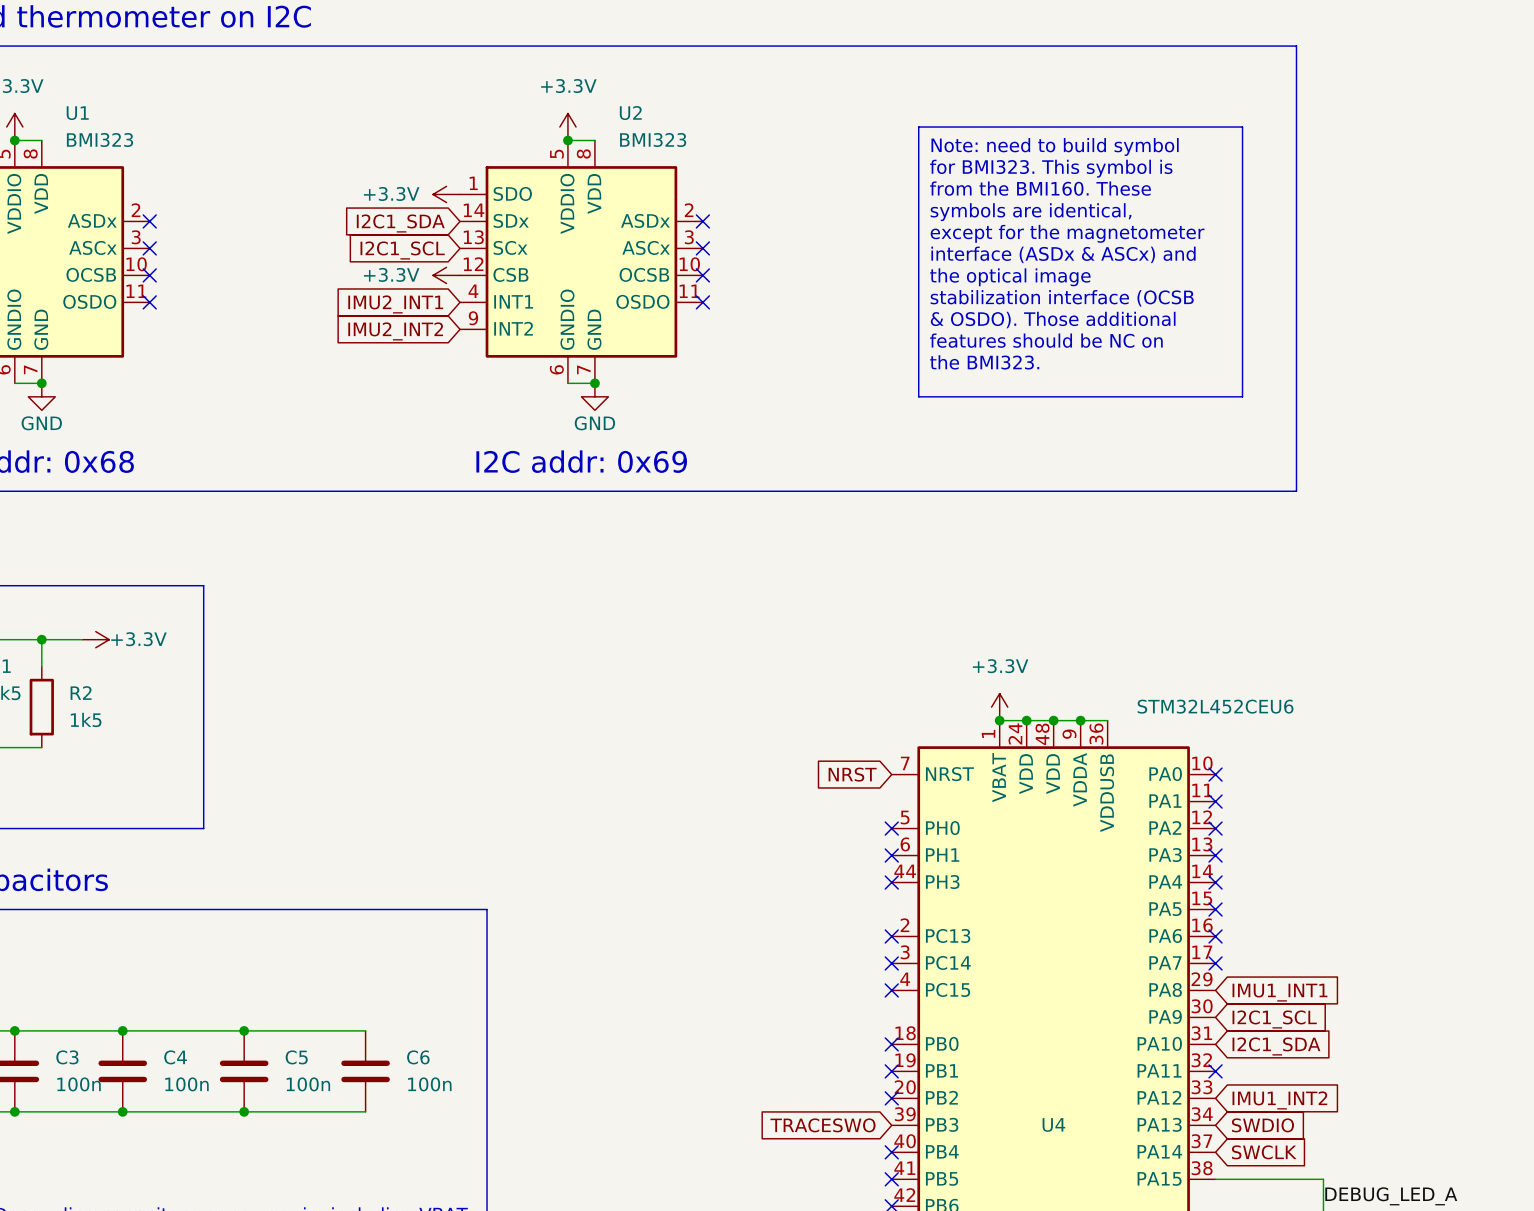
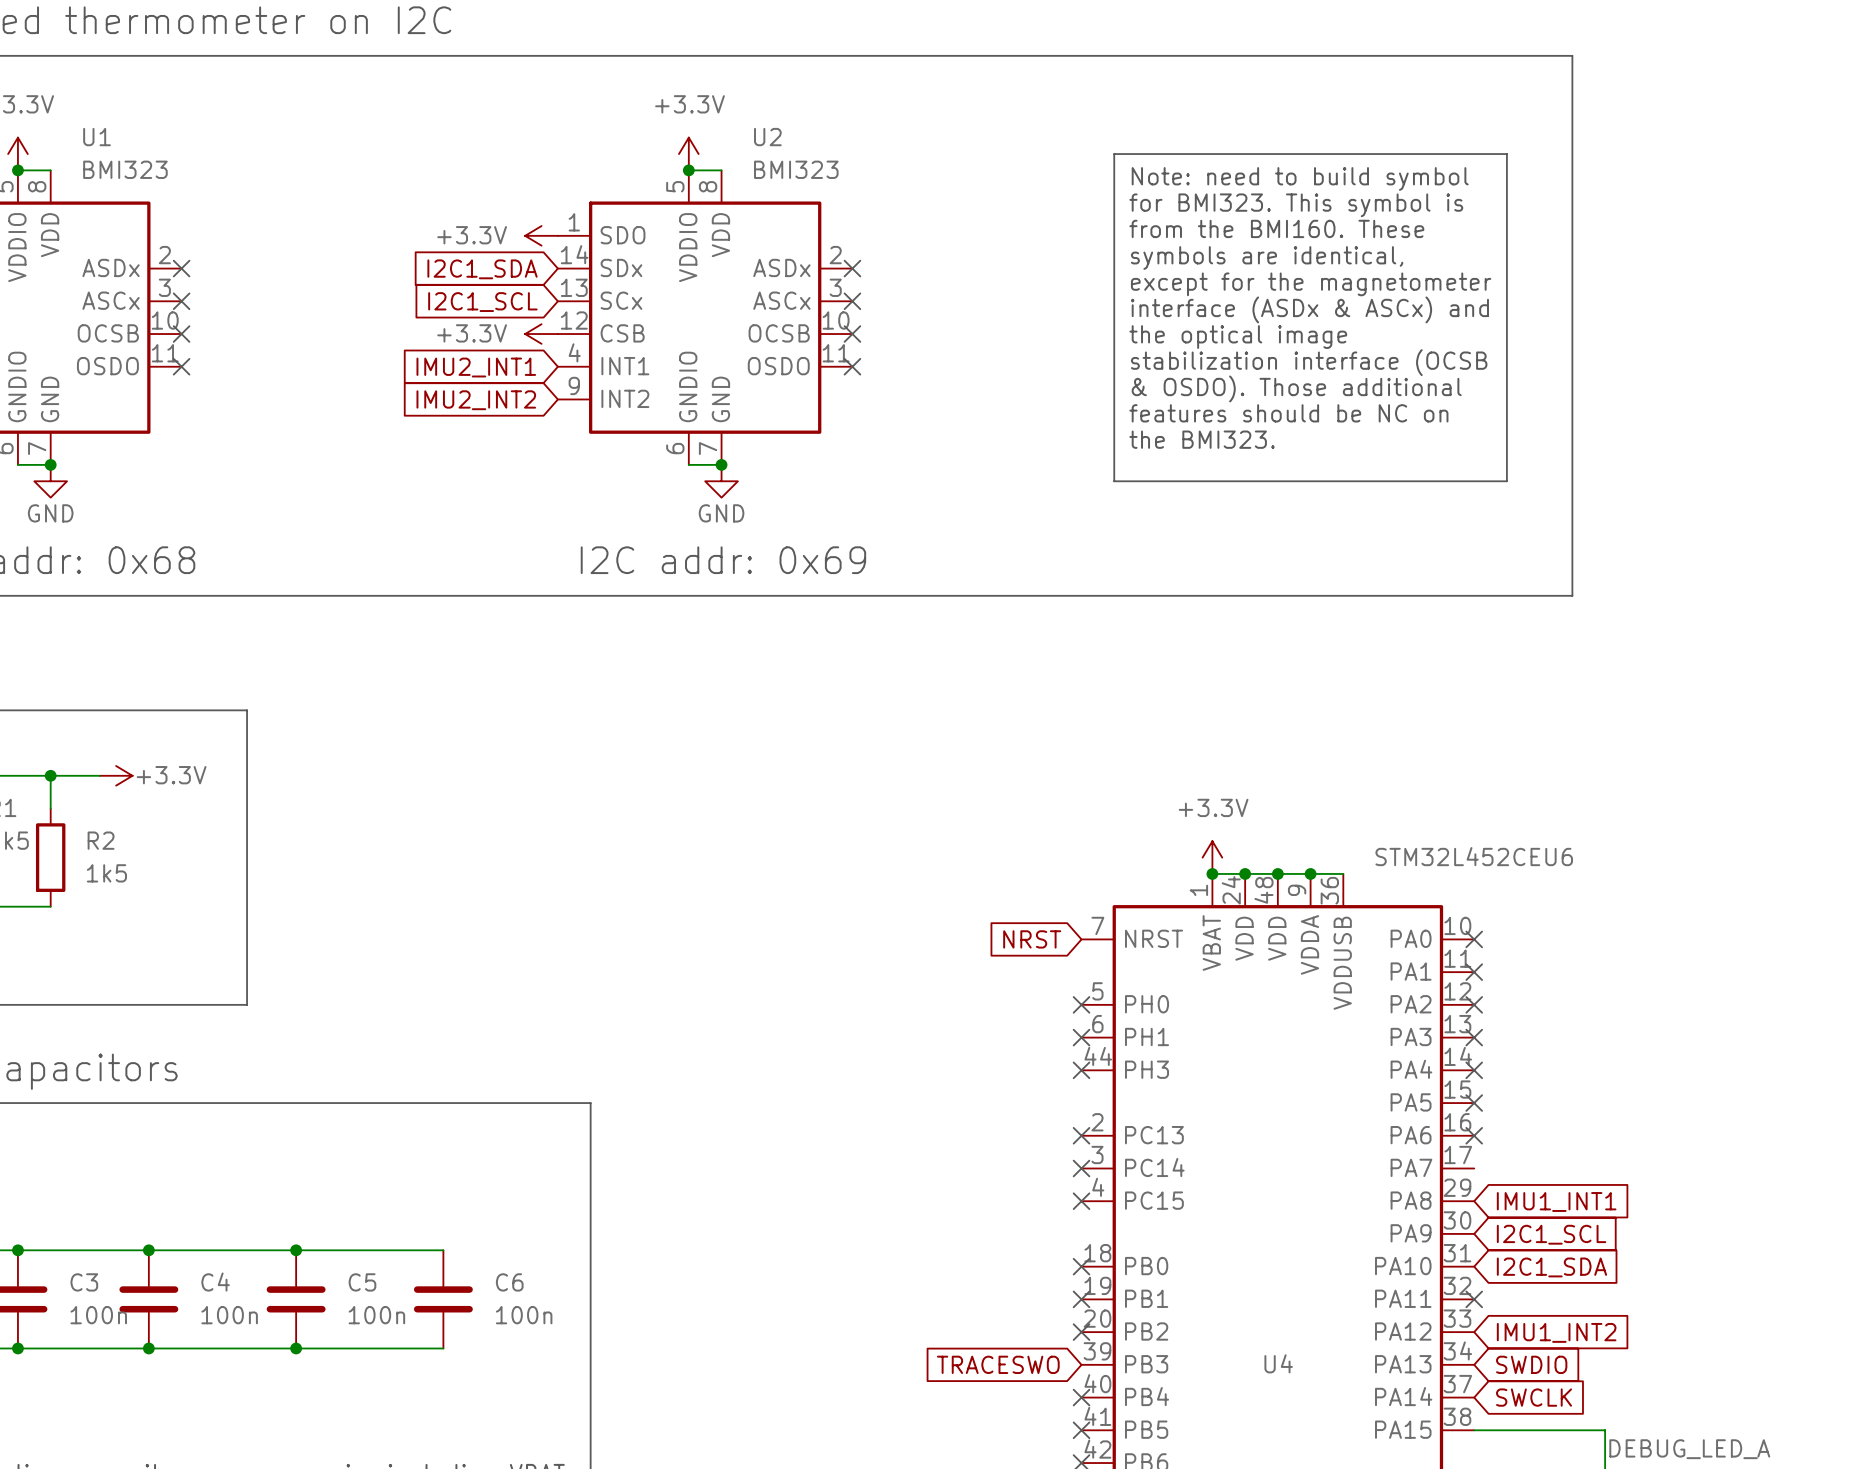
no-connect mark: (1215, 963) -> none

